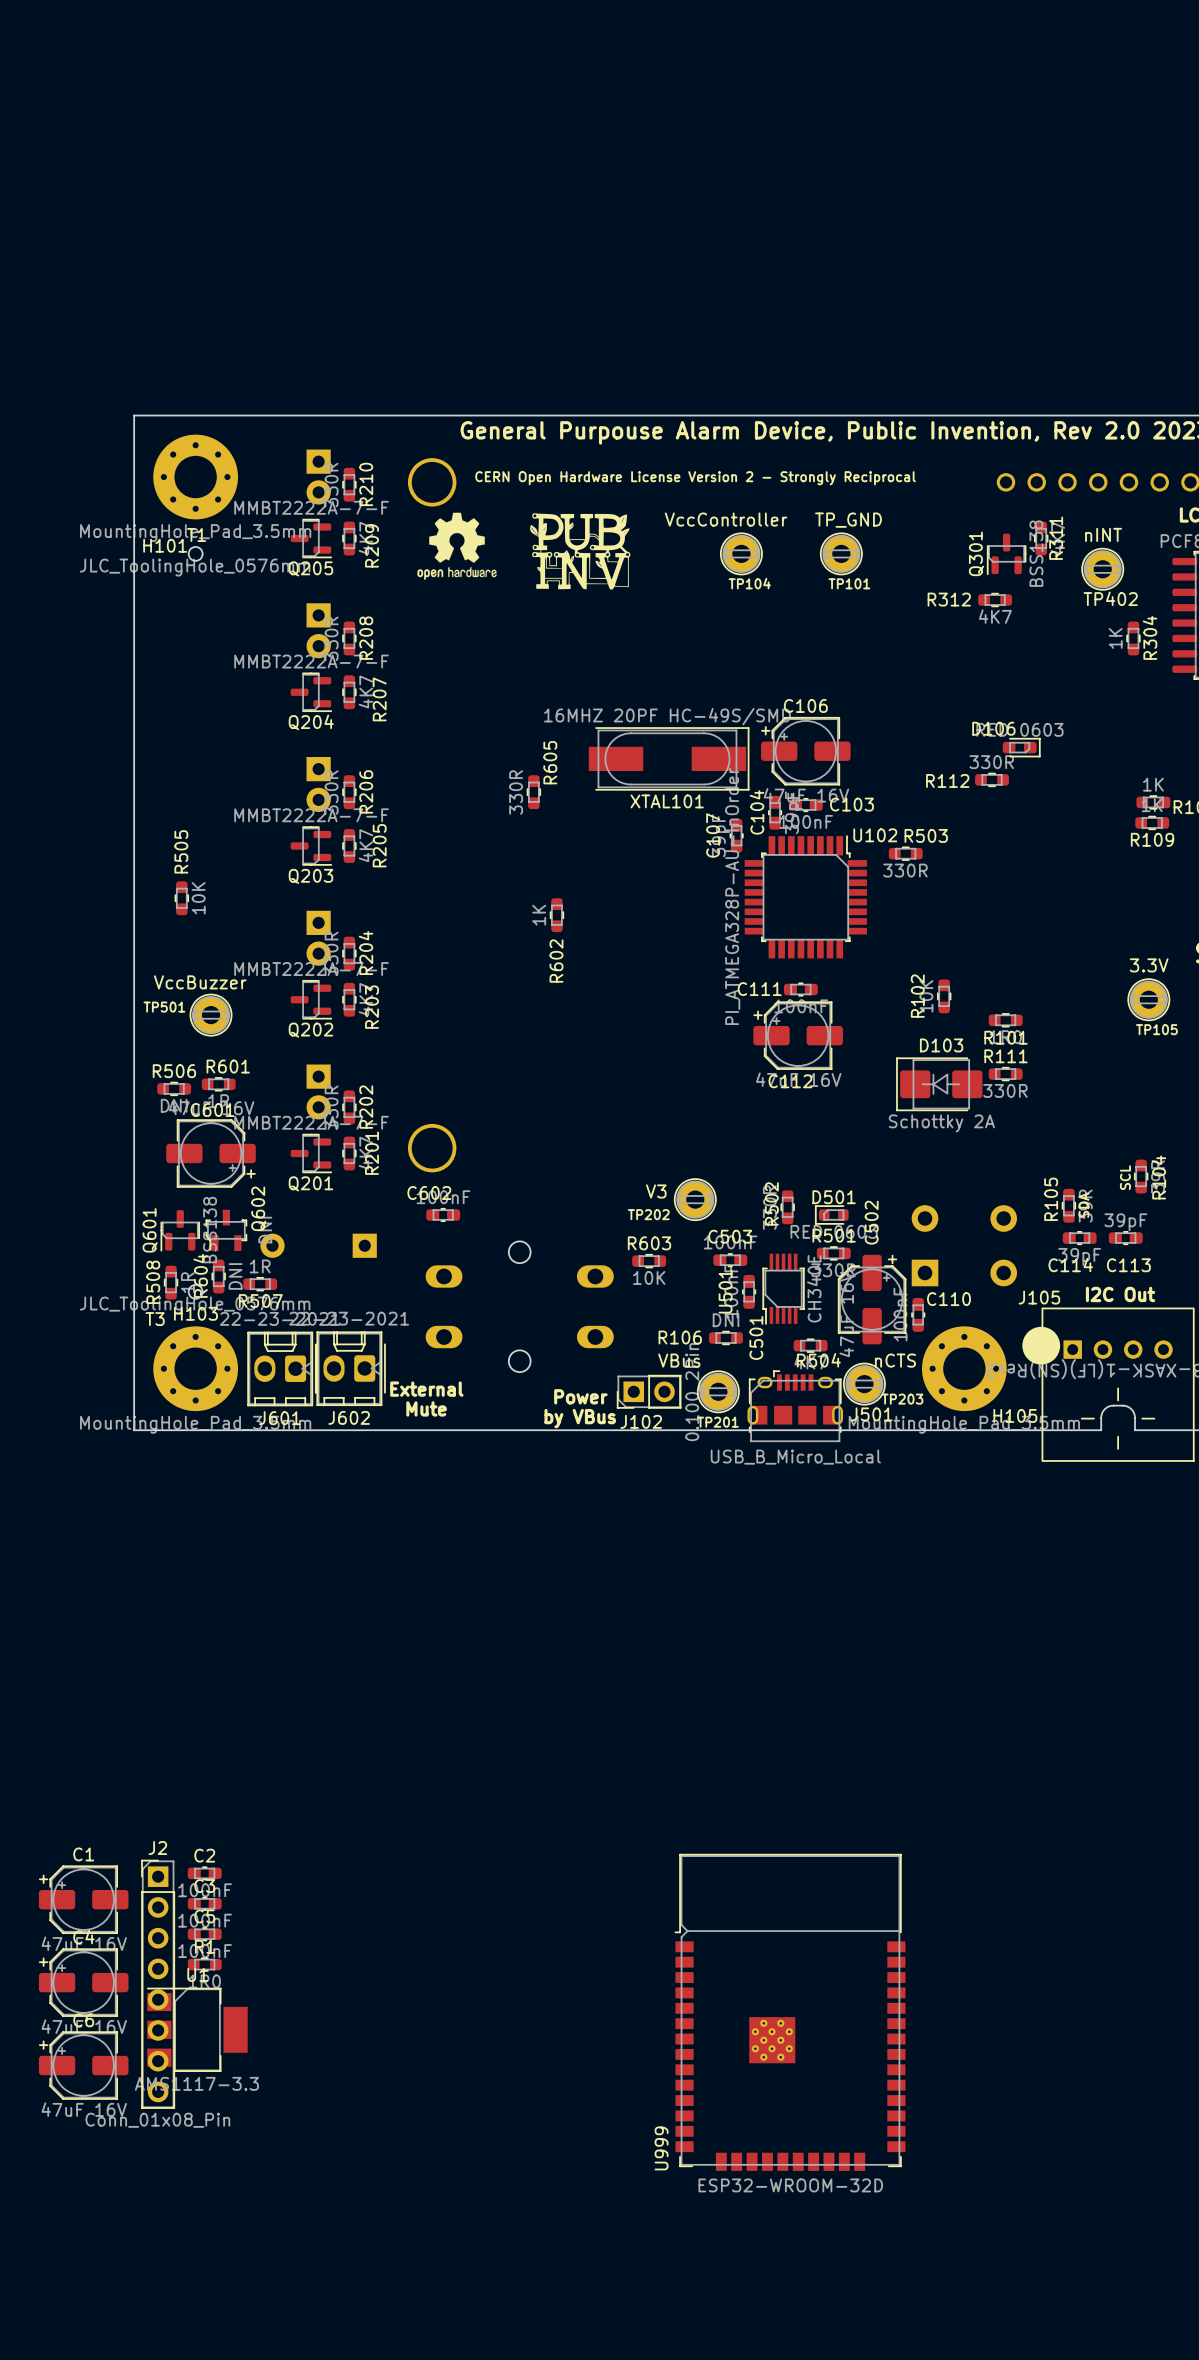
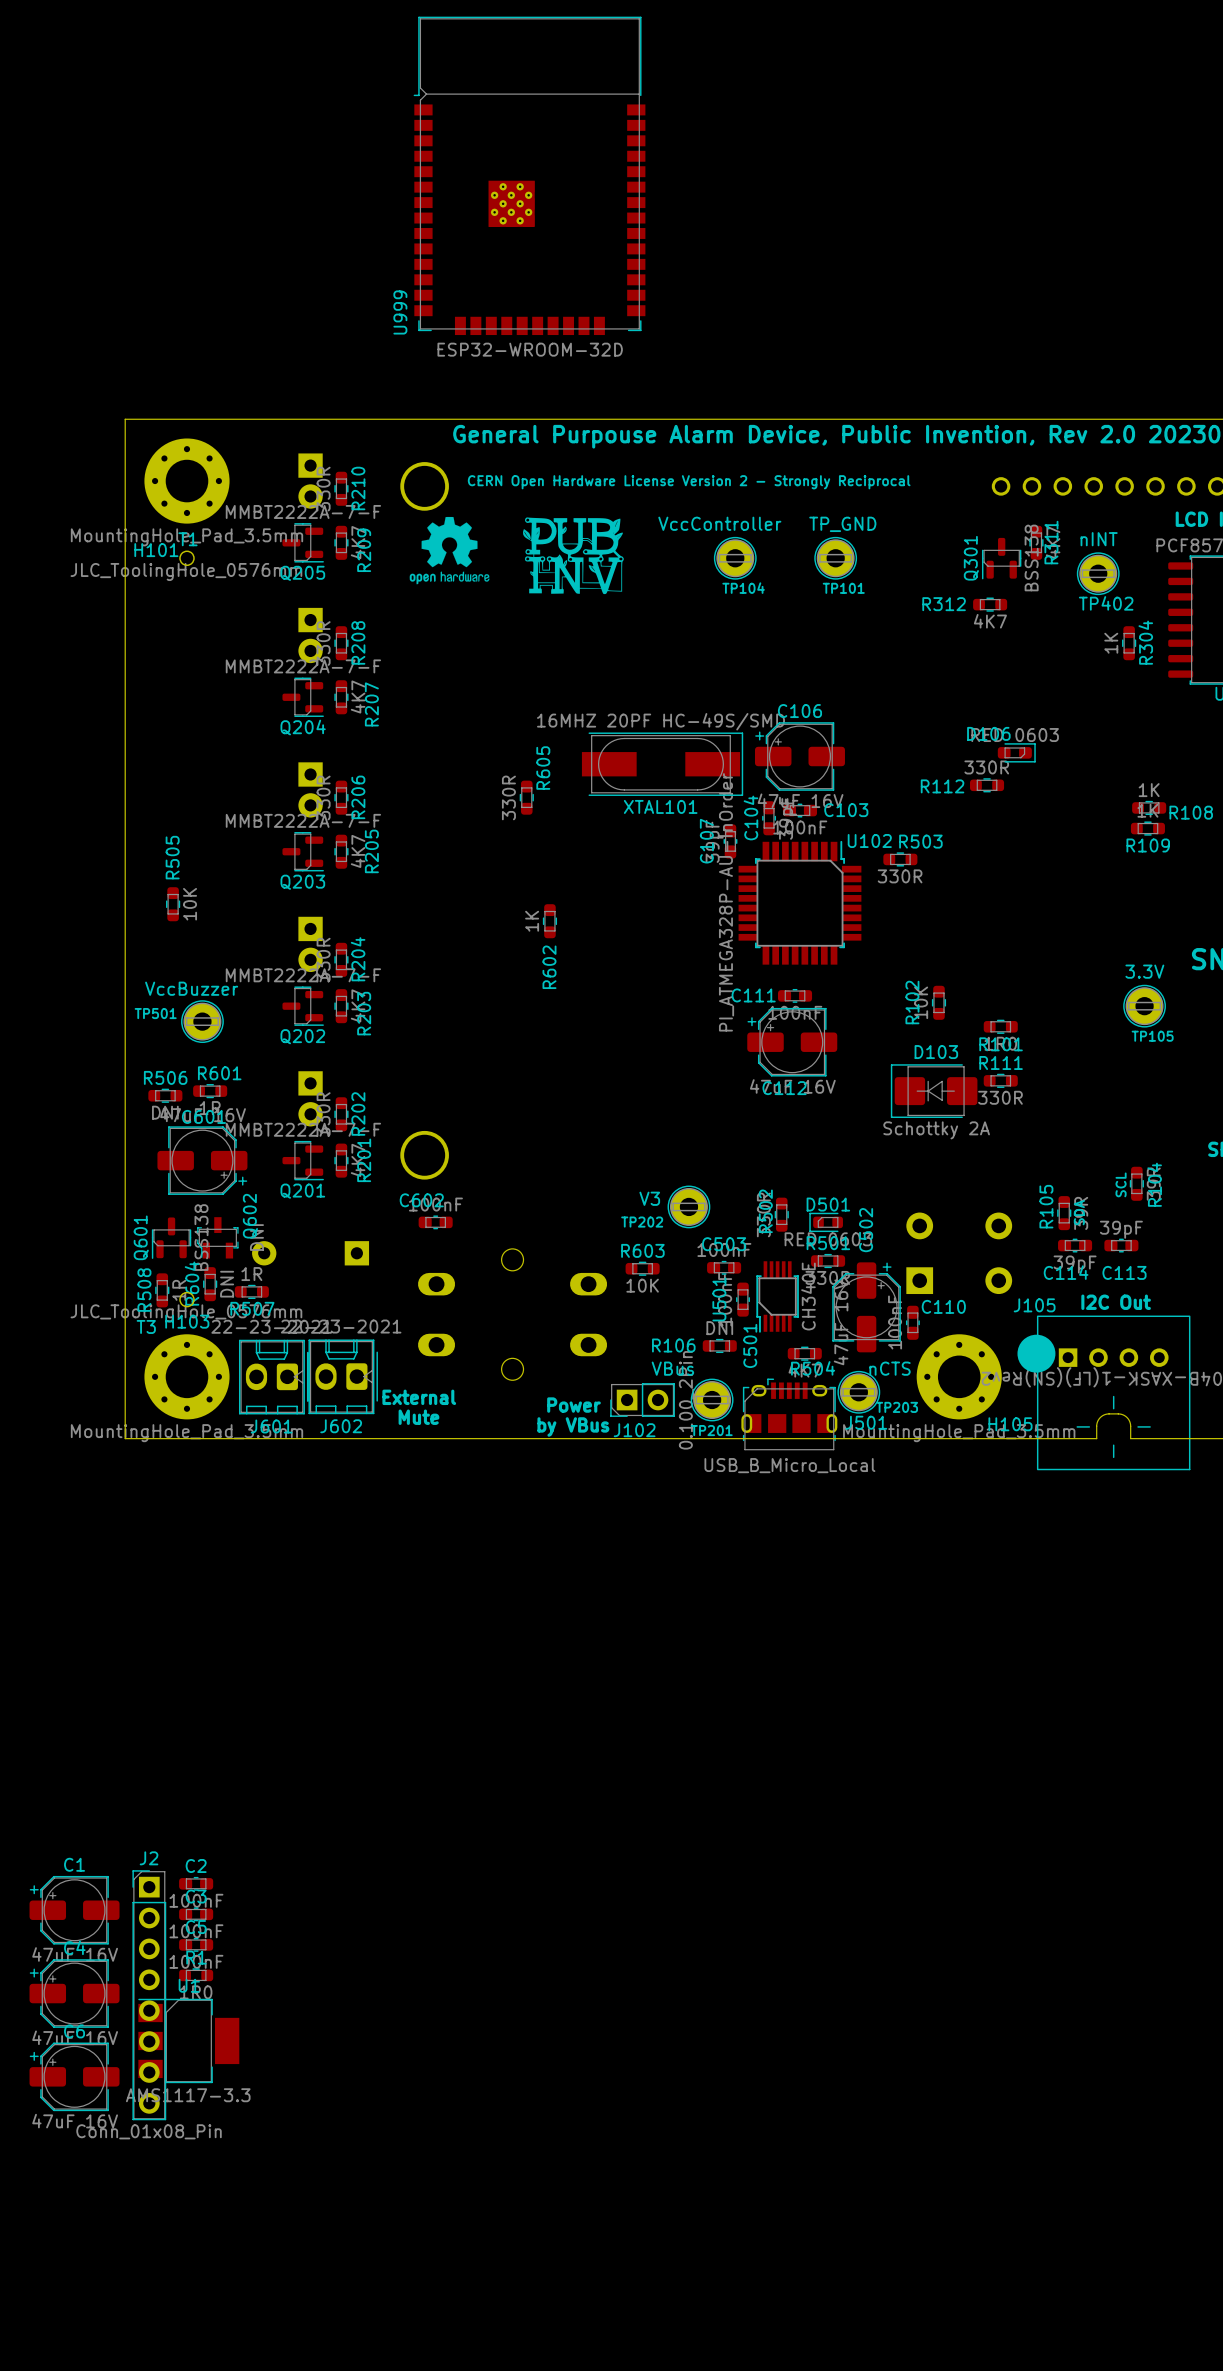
U999 position: (790, 2012) -> (529, 175)

